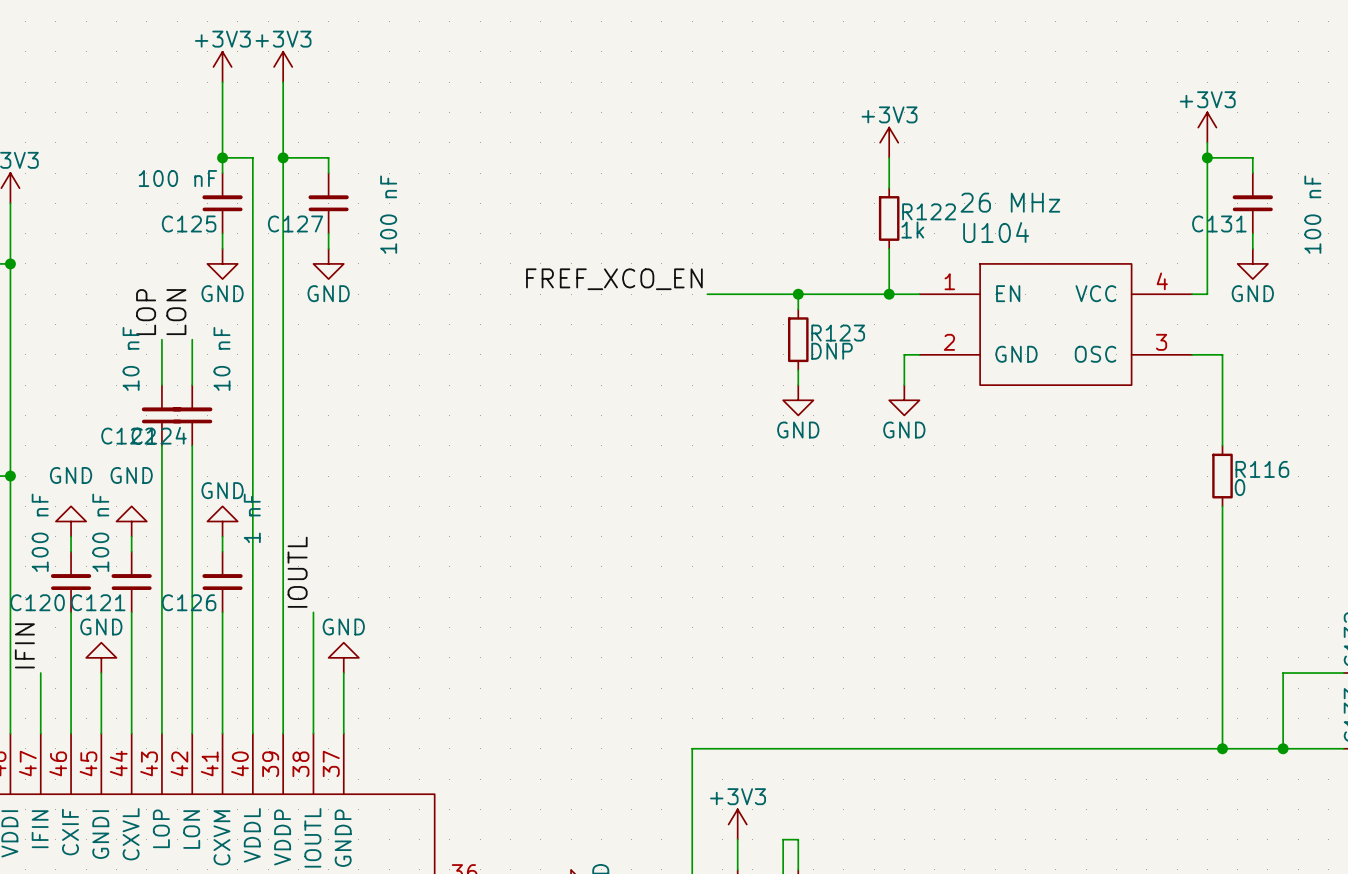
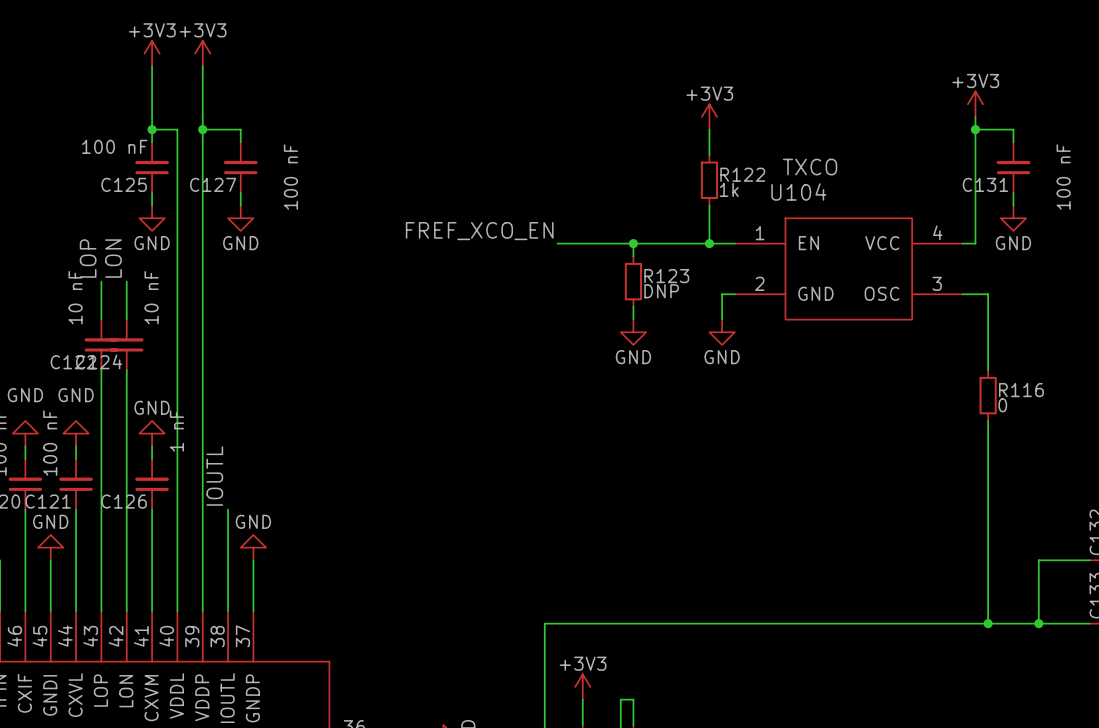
U104 value: 26 MHz (1010, 202) -> TXCO (810, 167)

